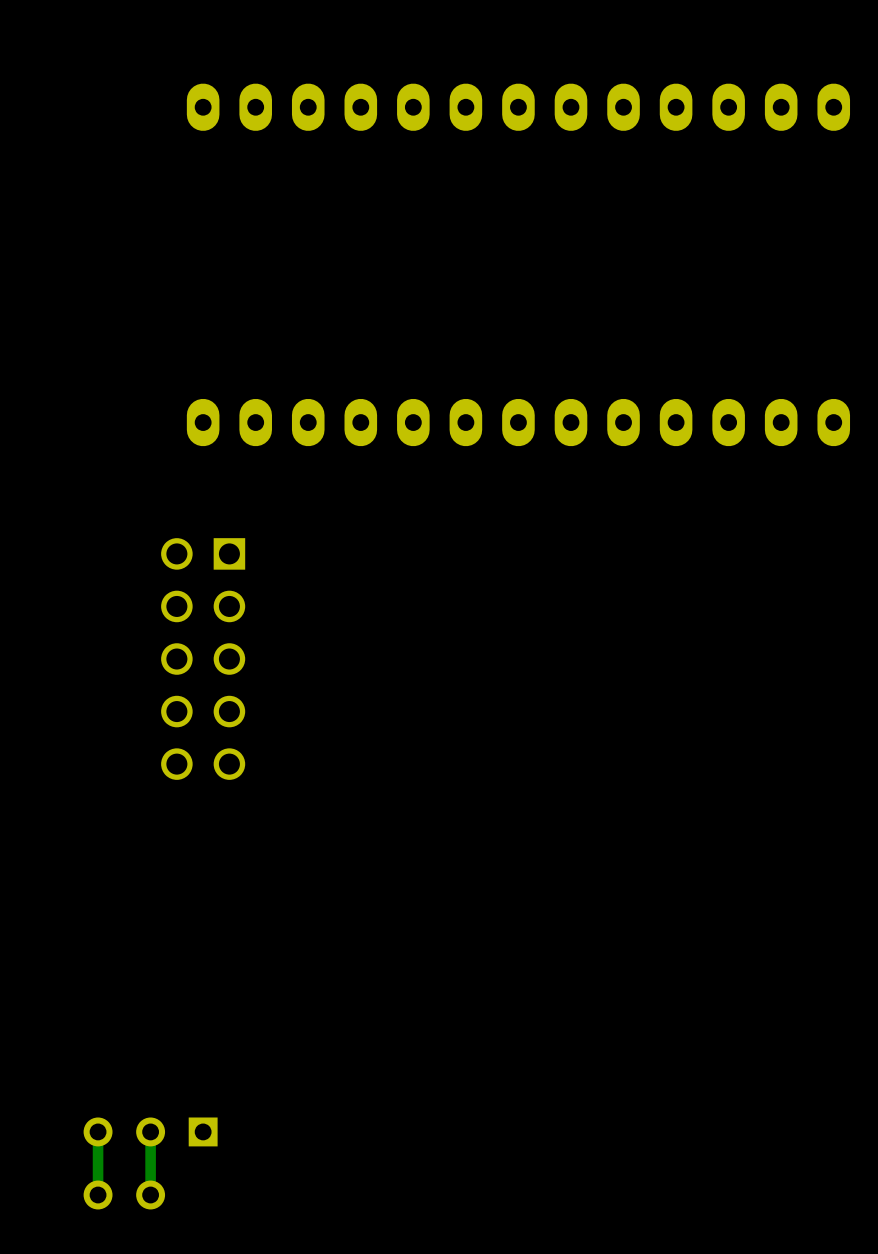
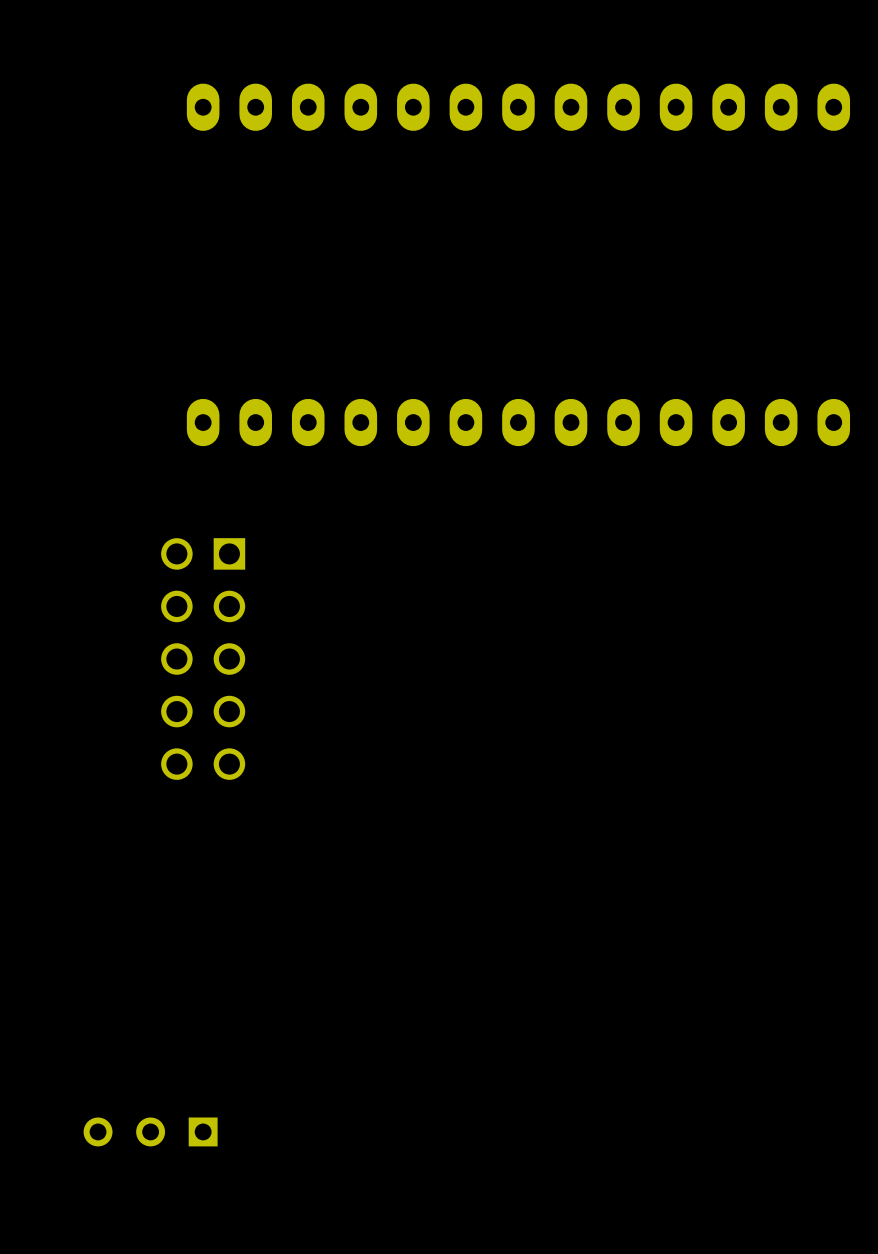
bottom track: (98, 1131) (98, 1195) -> none
bottom track: (150, 1131) (150, 1195) -> none
part: (124, 1195) -> none

